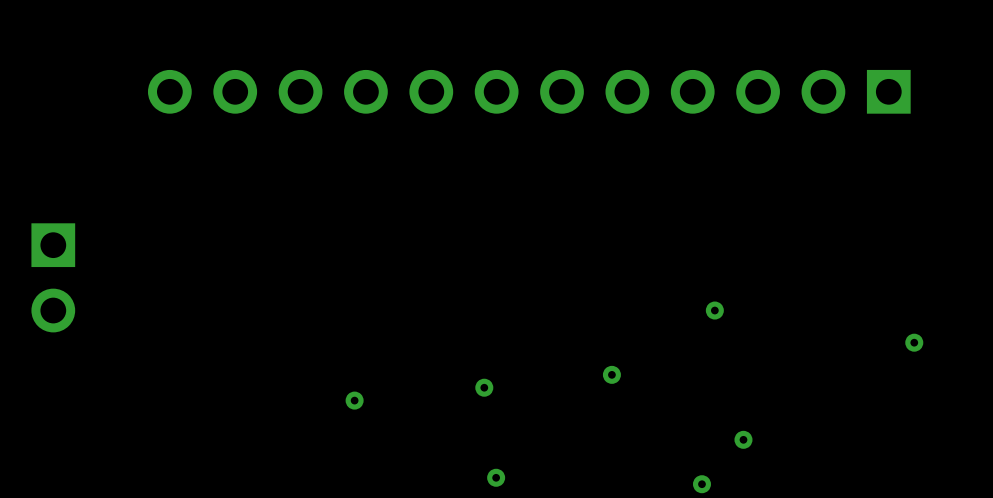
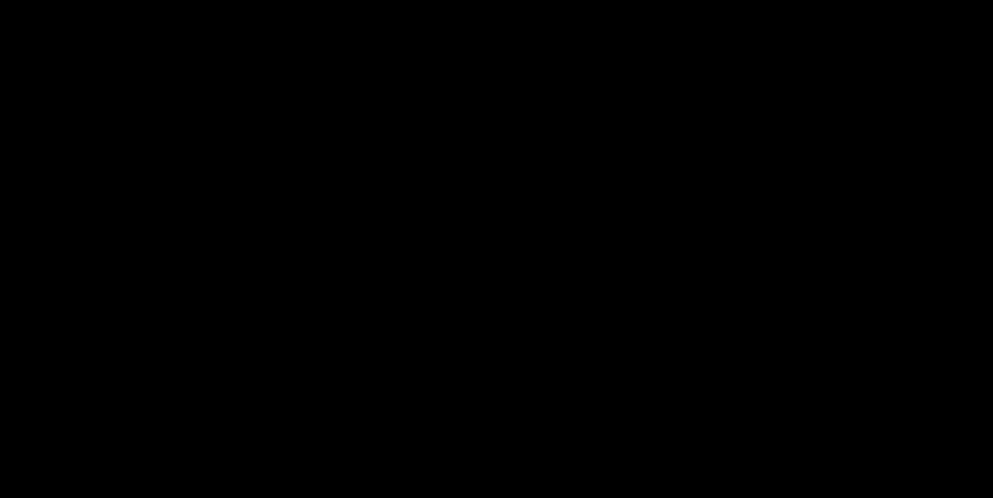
part: (529, 91) -> none
part: (53, 277) -> none
via: (714, 310) -> none
via: (914, 342) -> none
via: (611, 374) -> none
via: (484, 387) -> none
via: (354, 400) -> none
via: (743, 439) -> none
via: (496, 477) -> none
via: (701, 484) -> none

